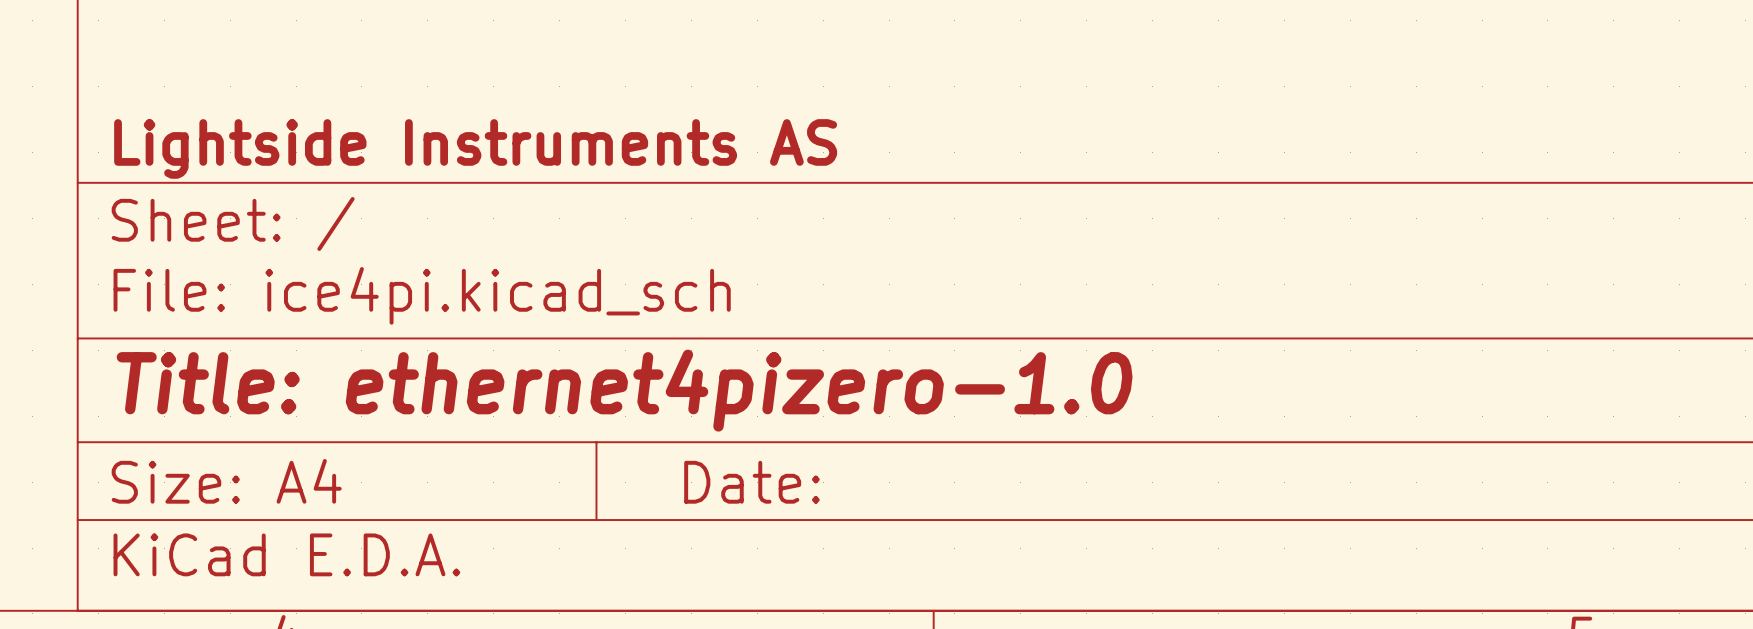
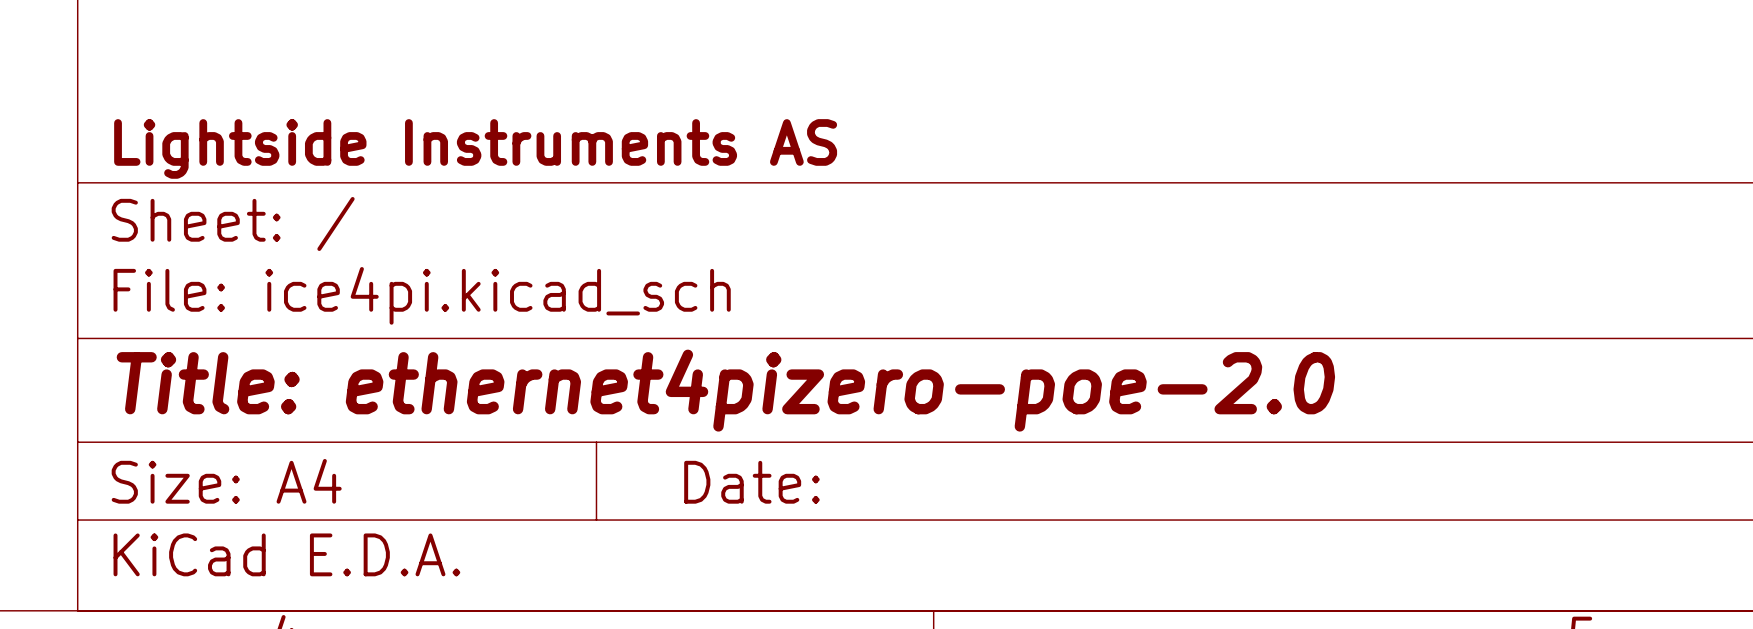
title block: Title: ethernet4pizero-1.0 (624, 390) -> Title: ethernet4pizero-poe-2.0 (725, 390)

